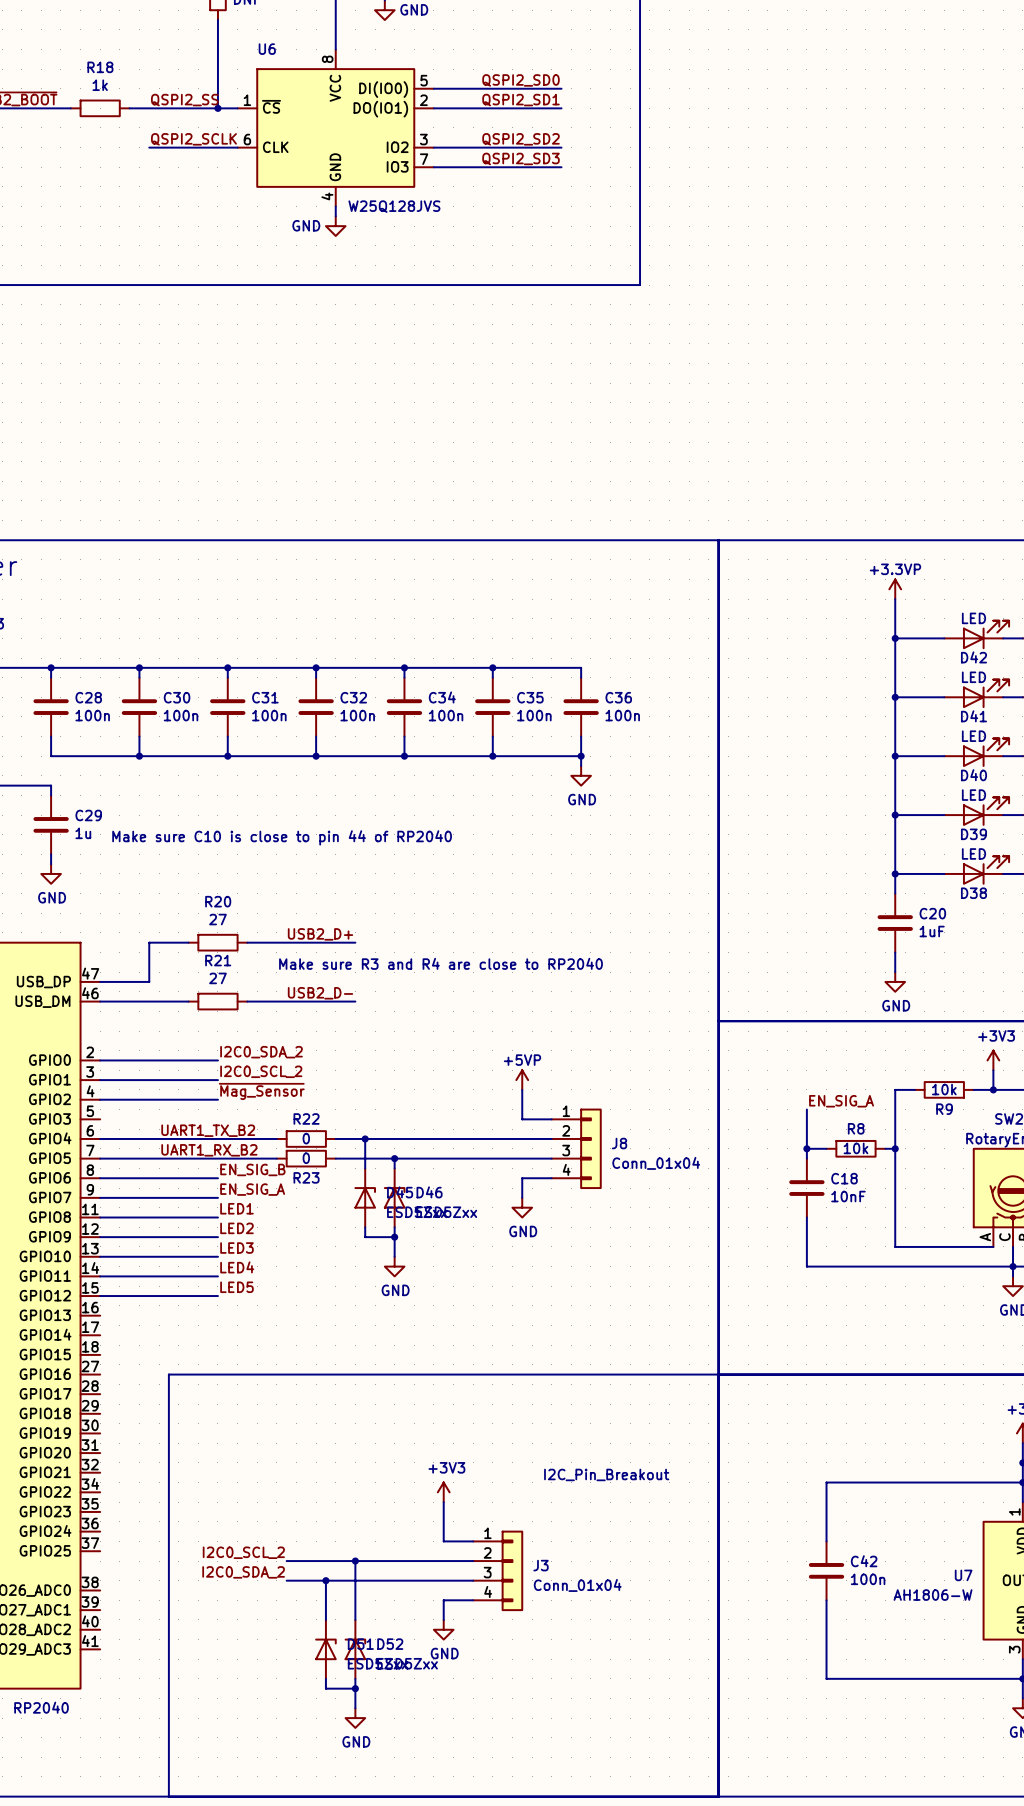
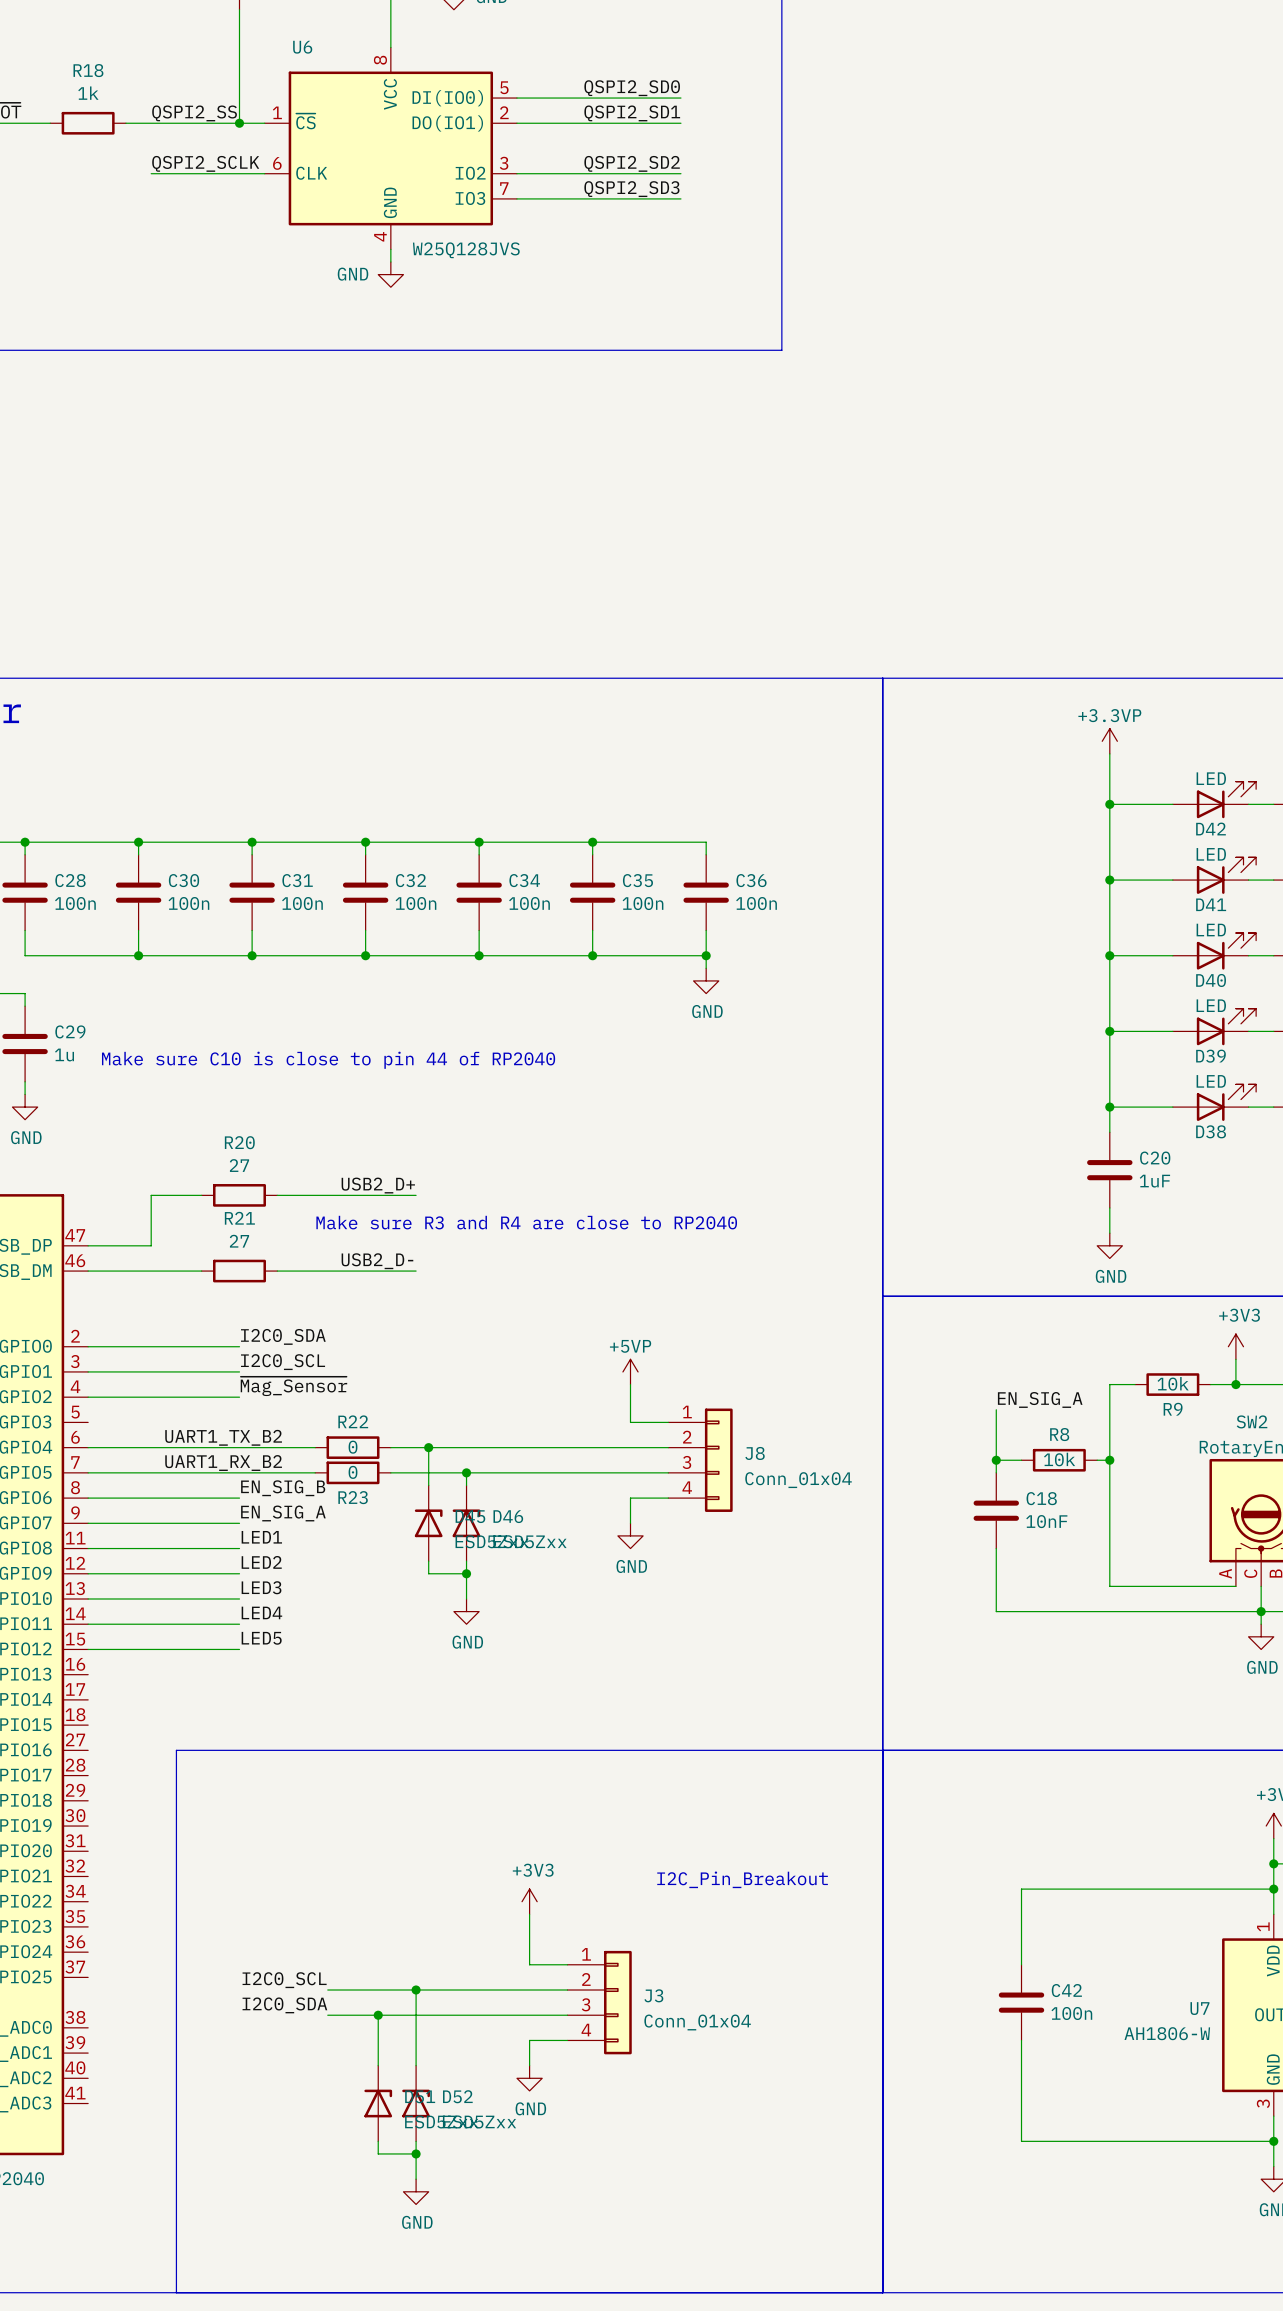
label: I2C0_SDA_2 (261, 1052) -> I2C0_SDA (283, 1336)
label: I2C0_SCL_2 (261, 1071) -> I2C0_SCL (283, 1362)
label: I2C0_SCL_2 (243, 1552) -> I2C0_SCL (284, 1980)
label: I2C0_SDA_2 (243, 1572) -> I2C0_SDA (284, 2005)

